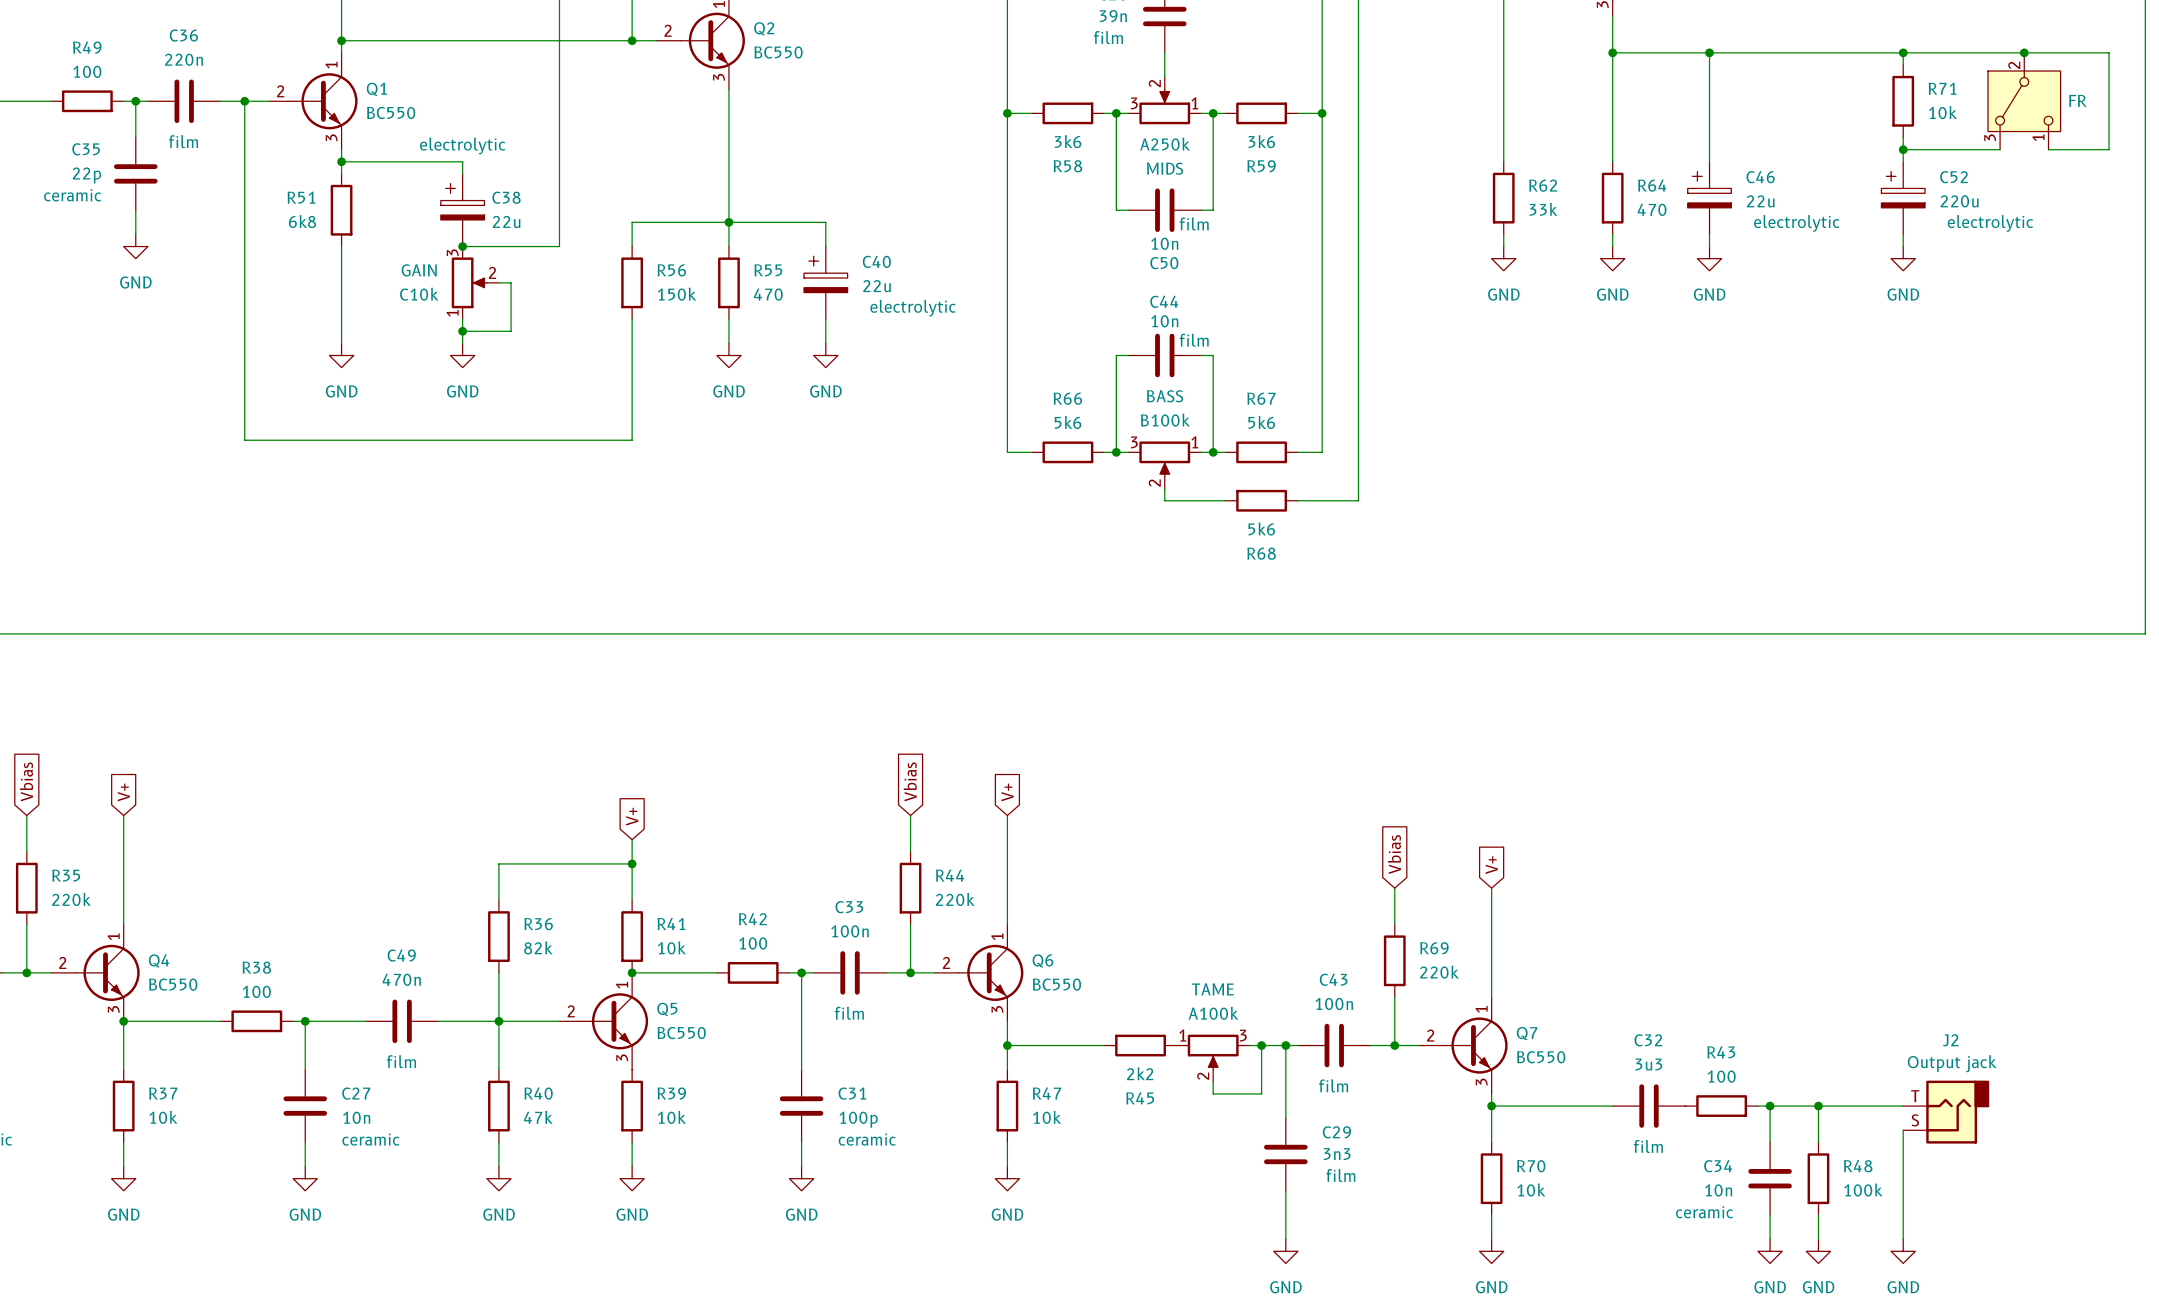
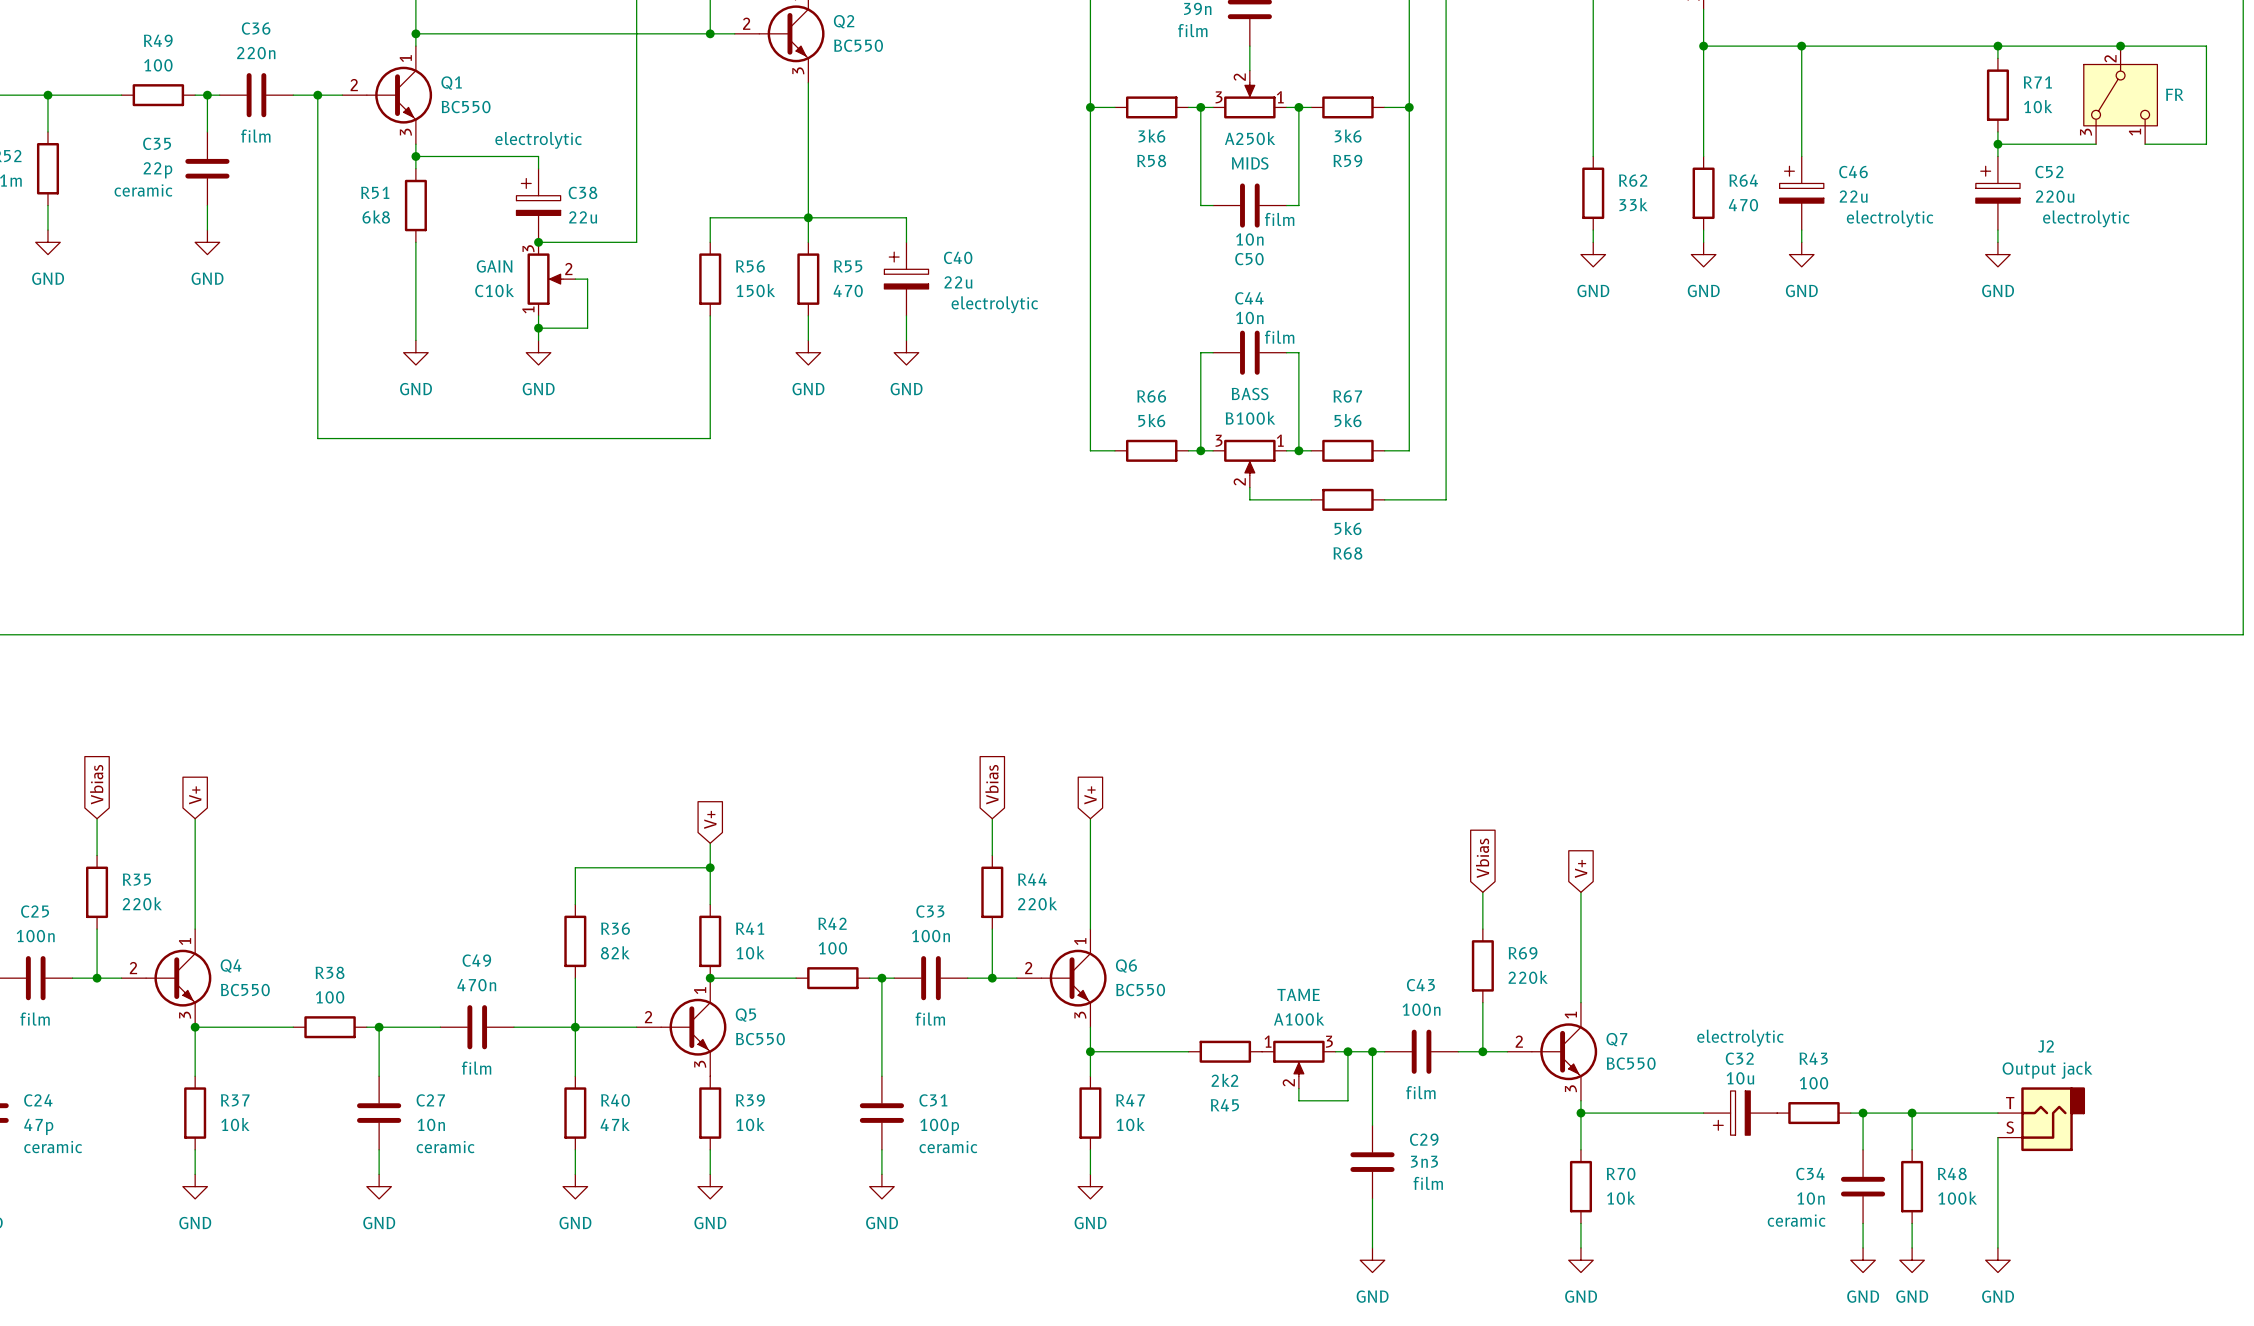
C32 value: 3u3 (1648, 1064) -> 10u (1740, 1078)
C32 symbol: [1612, 1084, 1686, 1128] -> [1703, 1090, 1778, 1136]
C32 text: film (1648, 1146) -> electrolytic (1740, 1038)

